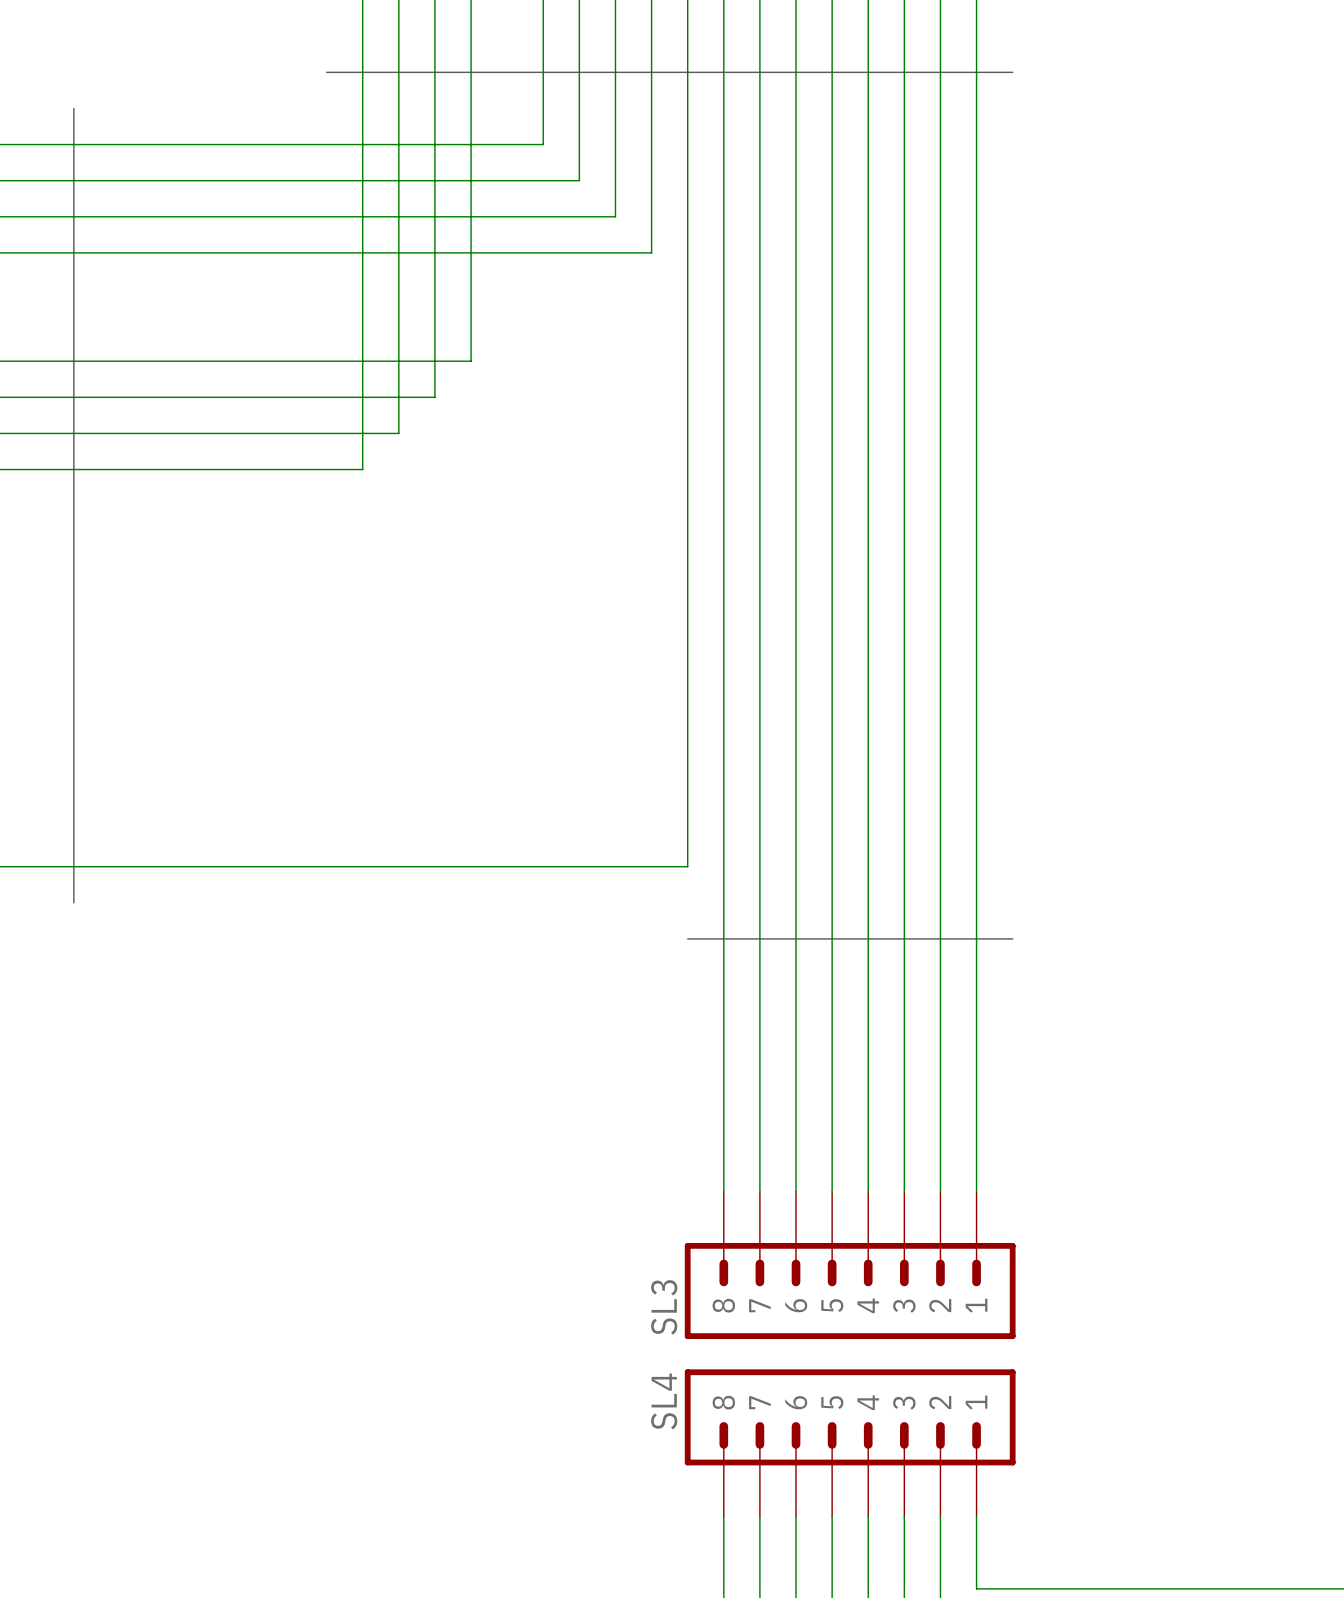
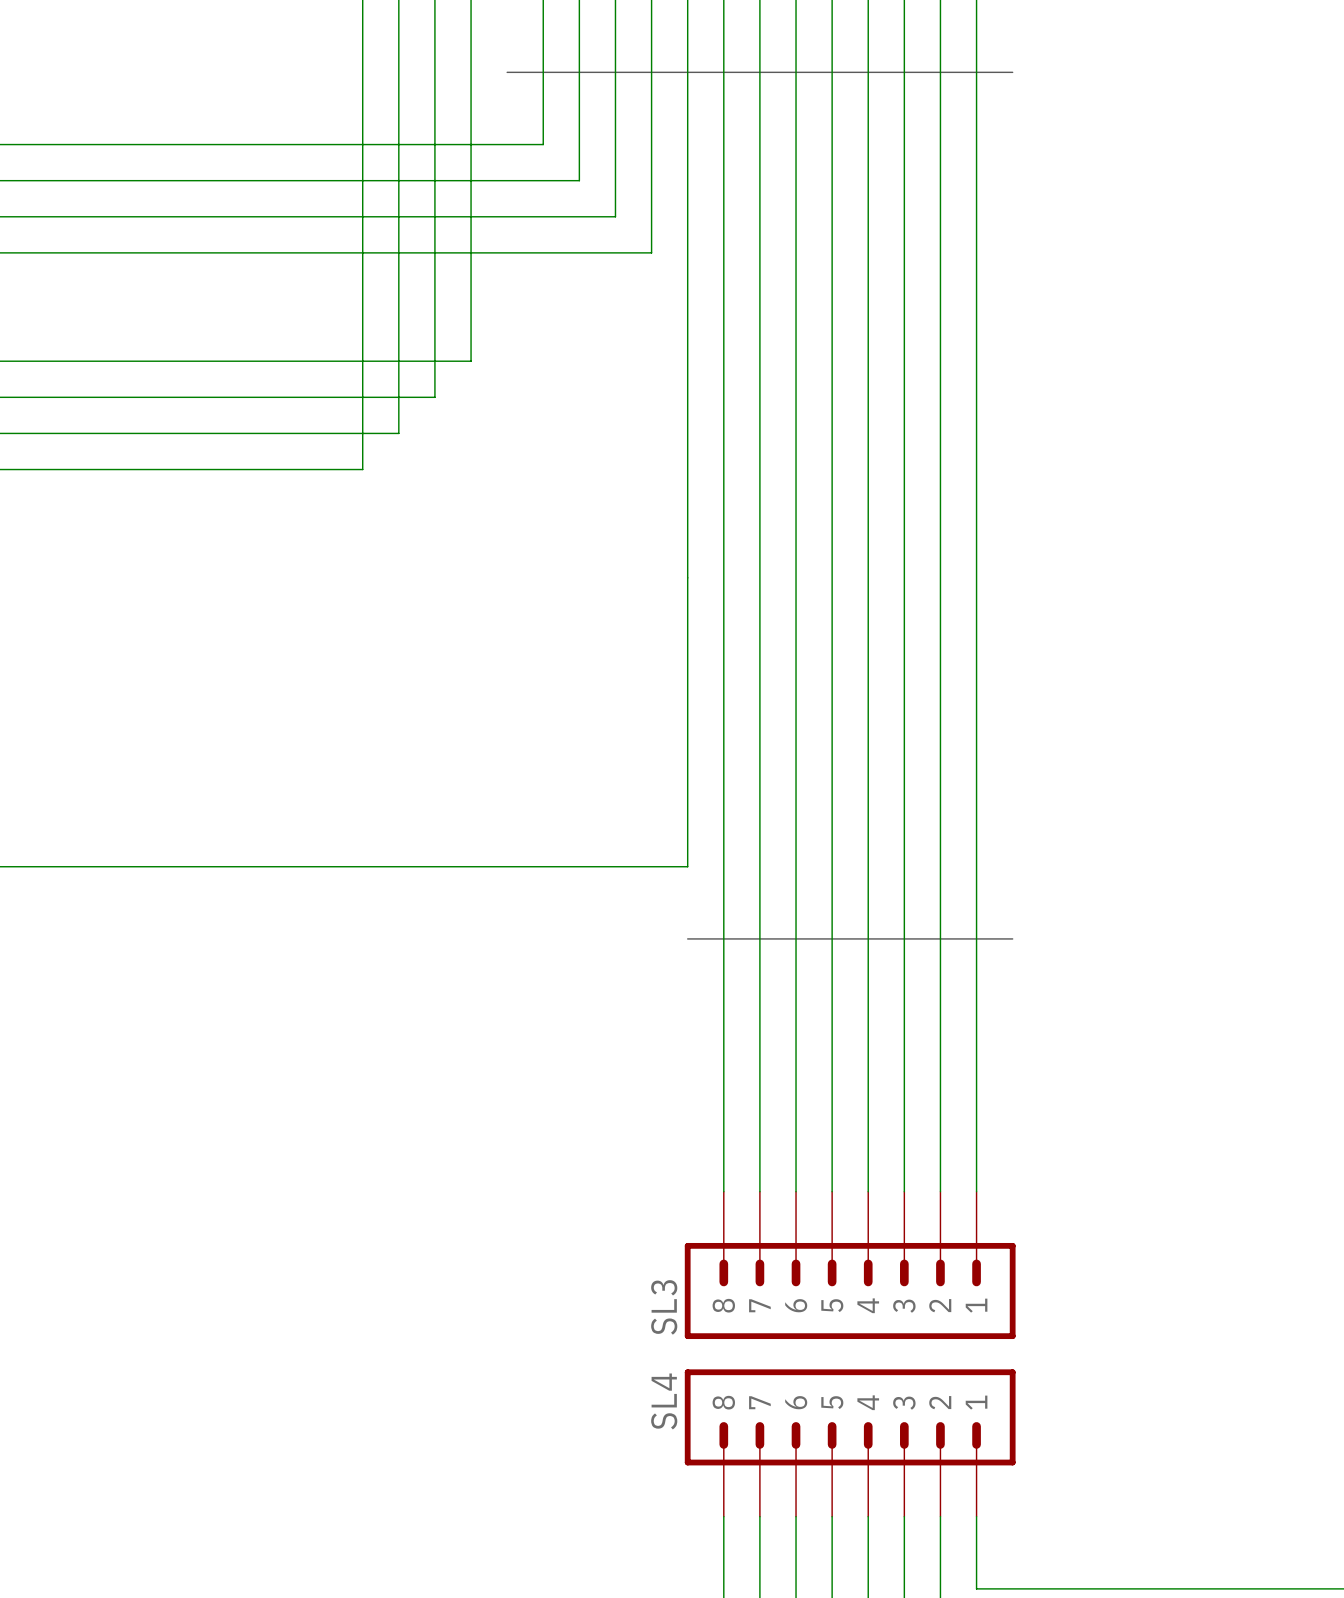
bus: (326, 72) (507, 72) -> none
bus: (73, 108) (73, 902) -> none

